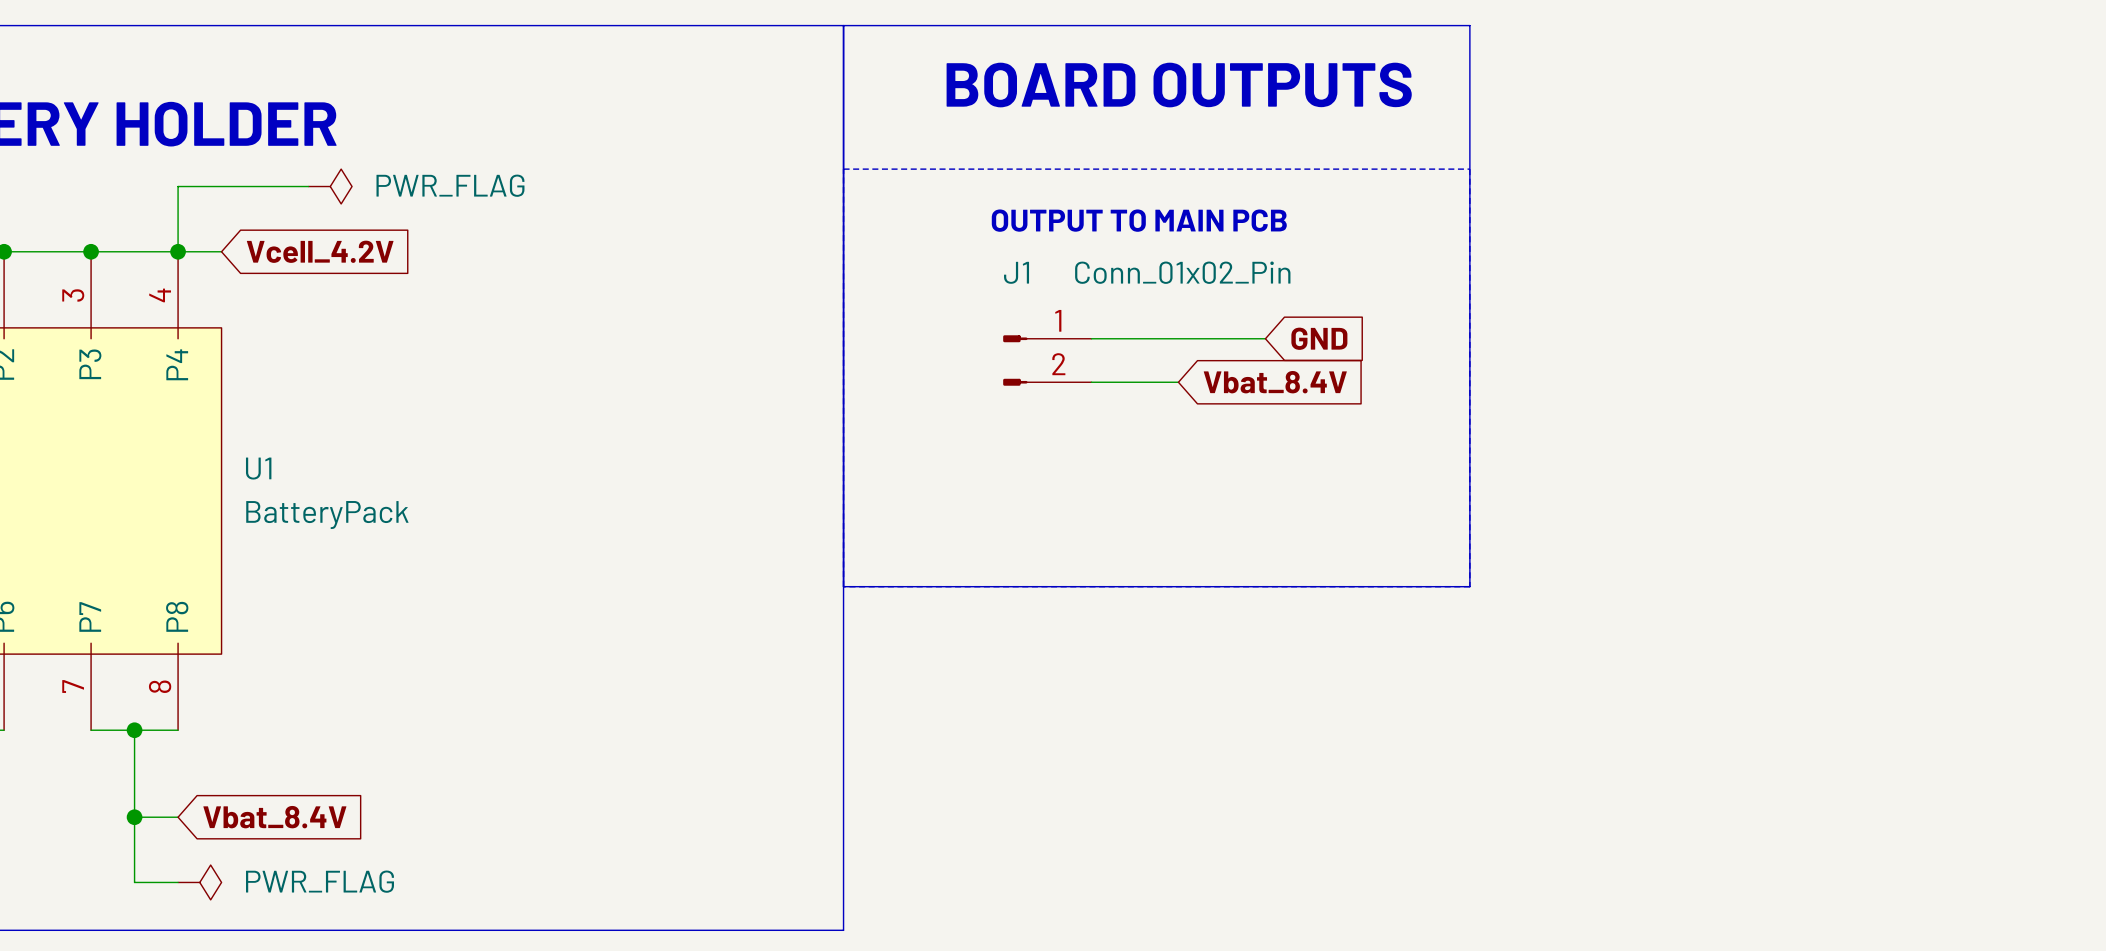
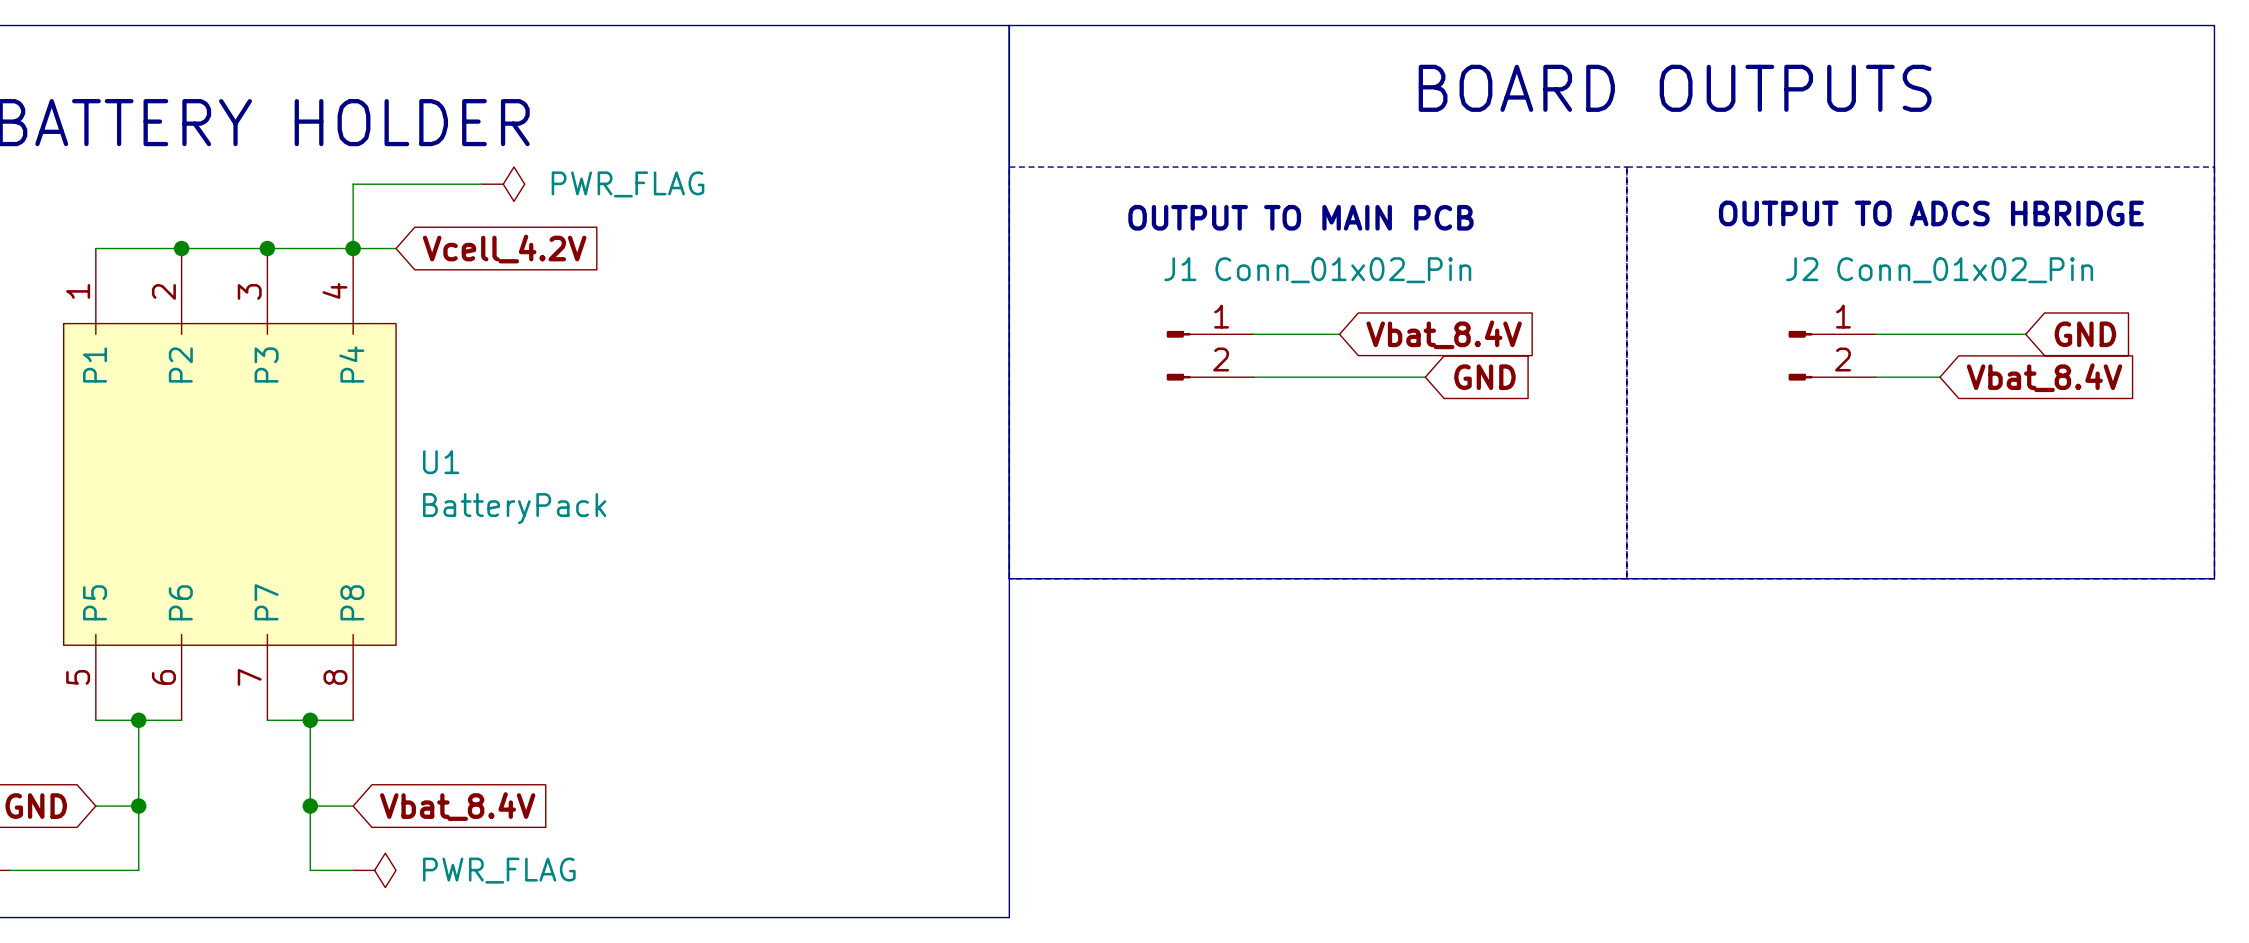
line: (1469, 25) (1469, 586) -> (1626, 25) (2214, 25) (2214, 578)
text position: BOARD OUTPUTS (1179, 85) -> BOARD OUTPUTS (1675, 88)
line: none -> (1626, 167) (2214, 167) (2214, 578)
text: none -> OUTPUT TO ADCS HBRIDGE (1931, 213)
wire: (1178, 338) (1265, 338) -> (1339, 377) (1425, 377)
global label position: GND (1319, 338) -> GND (1484, 377)
wire: none -> (1875, 334) (2025, 334)
global label: none -> GND (2085, 334)
J2: none -> Conn_01x02_Pin (1832, 355)
global label position: Vbat_8.4V (1275, 382) -> Vbat_8.4V (1444, 334)
wire: none -> (1875, 377) (1939, 377)
global label: none -> Vbat_8.4V (2044, 377)
line: none -> (2214, 578) (1626, 578) (2214, 578)

